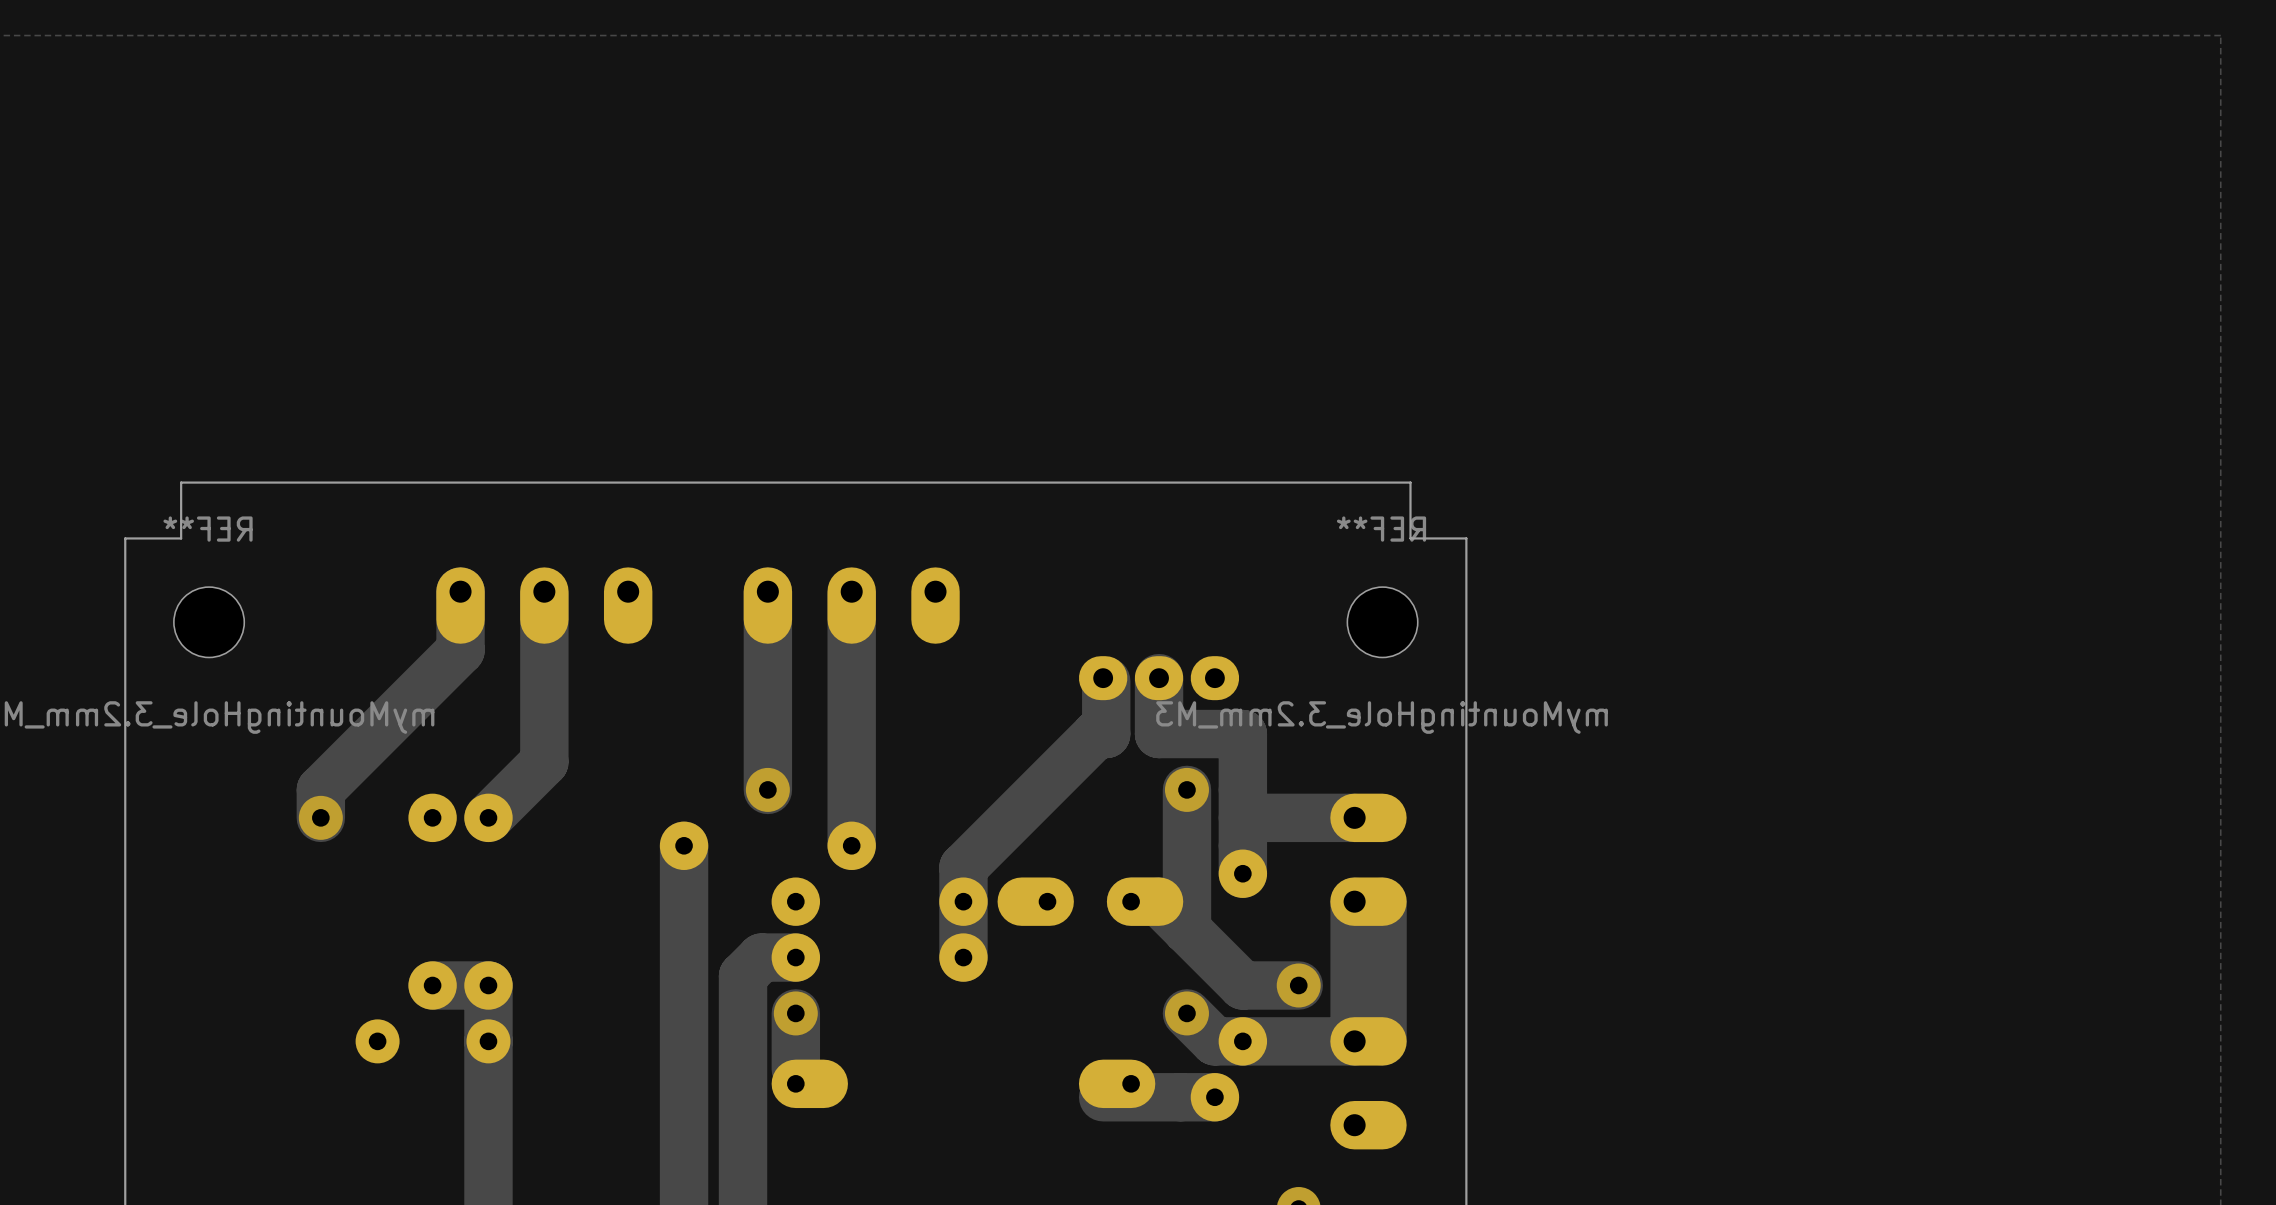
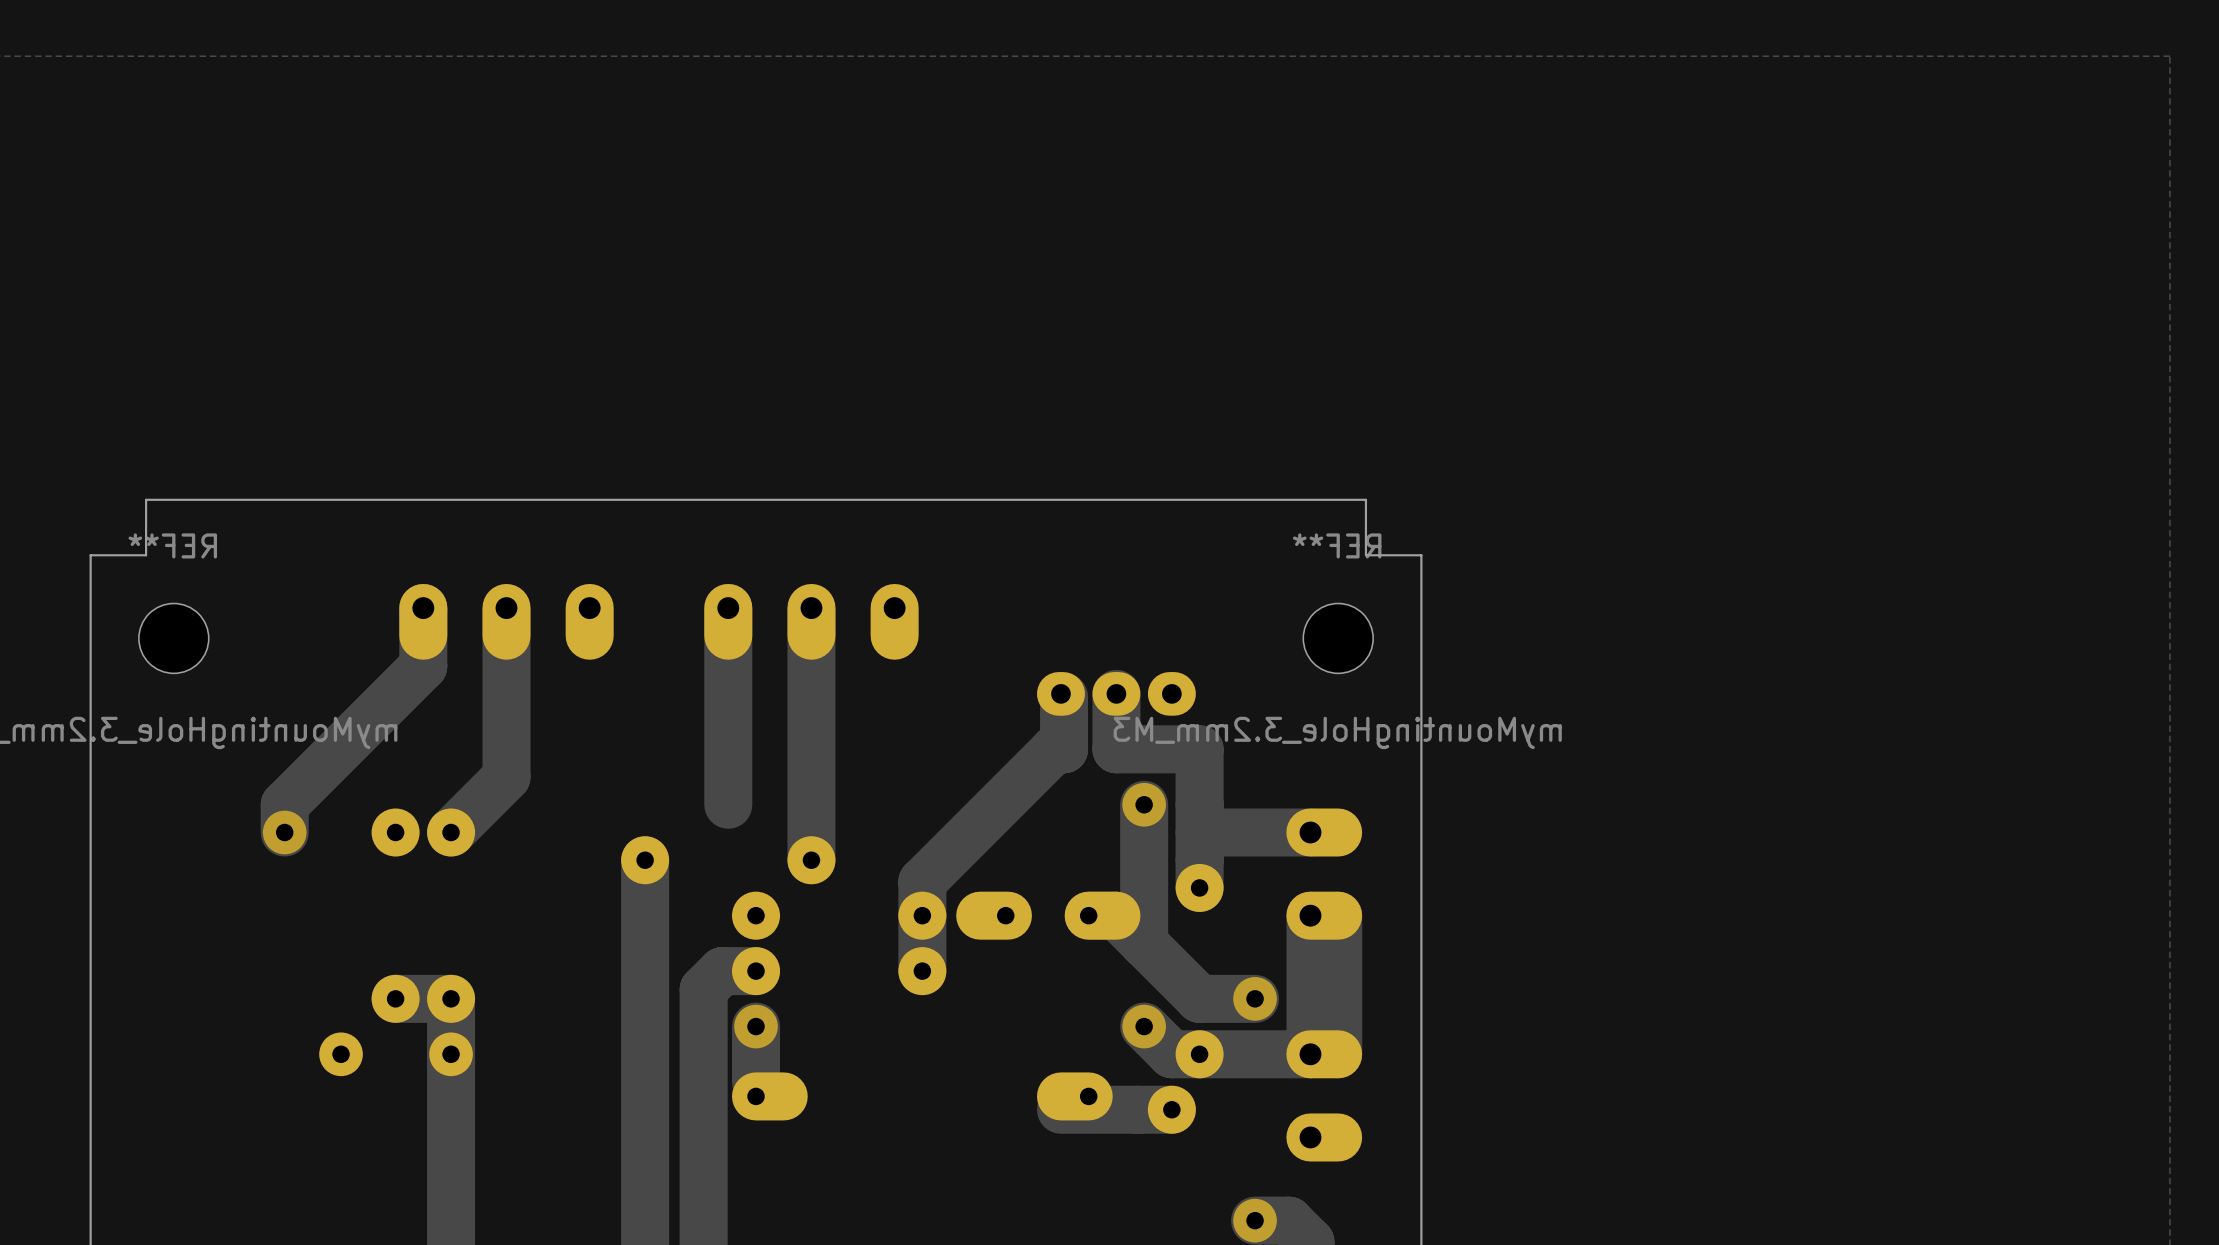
via: (767, 789) -> none

